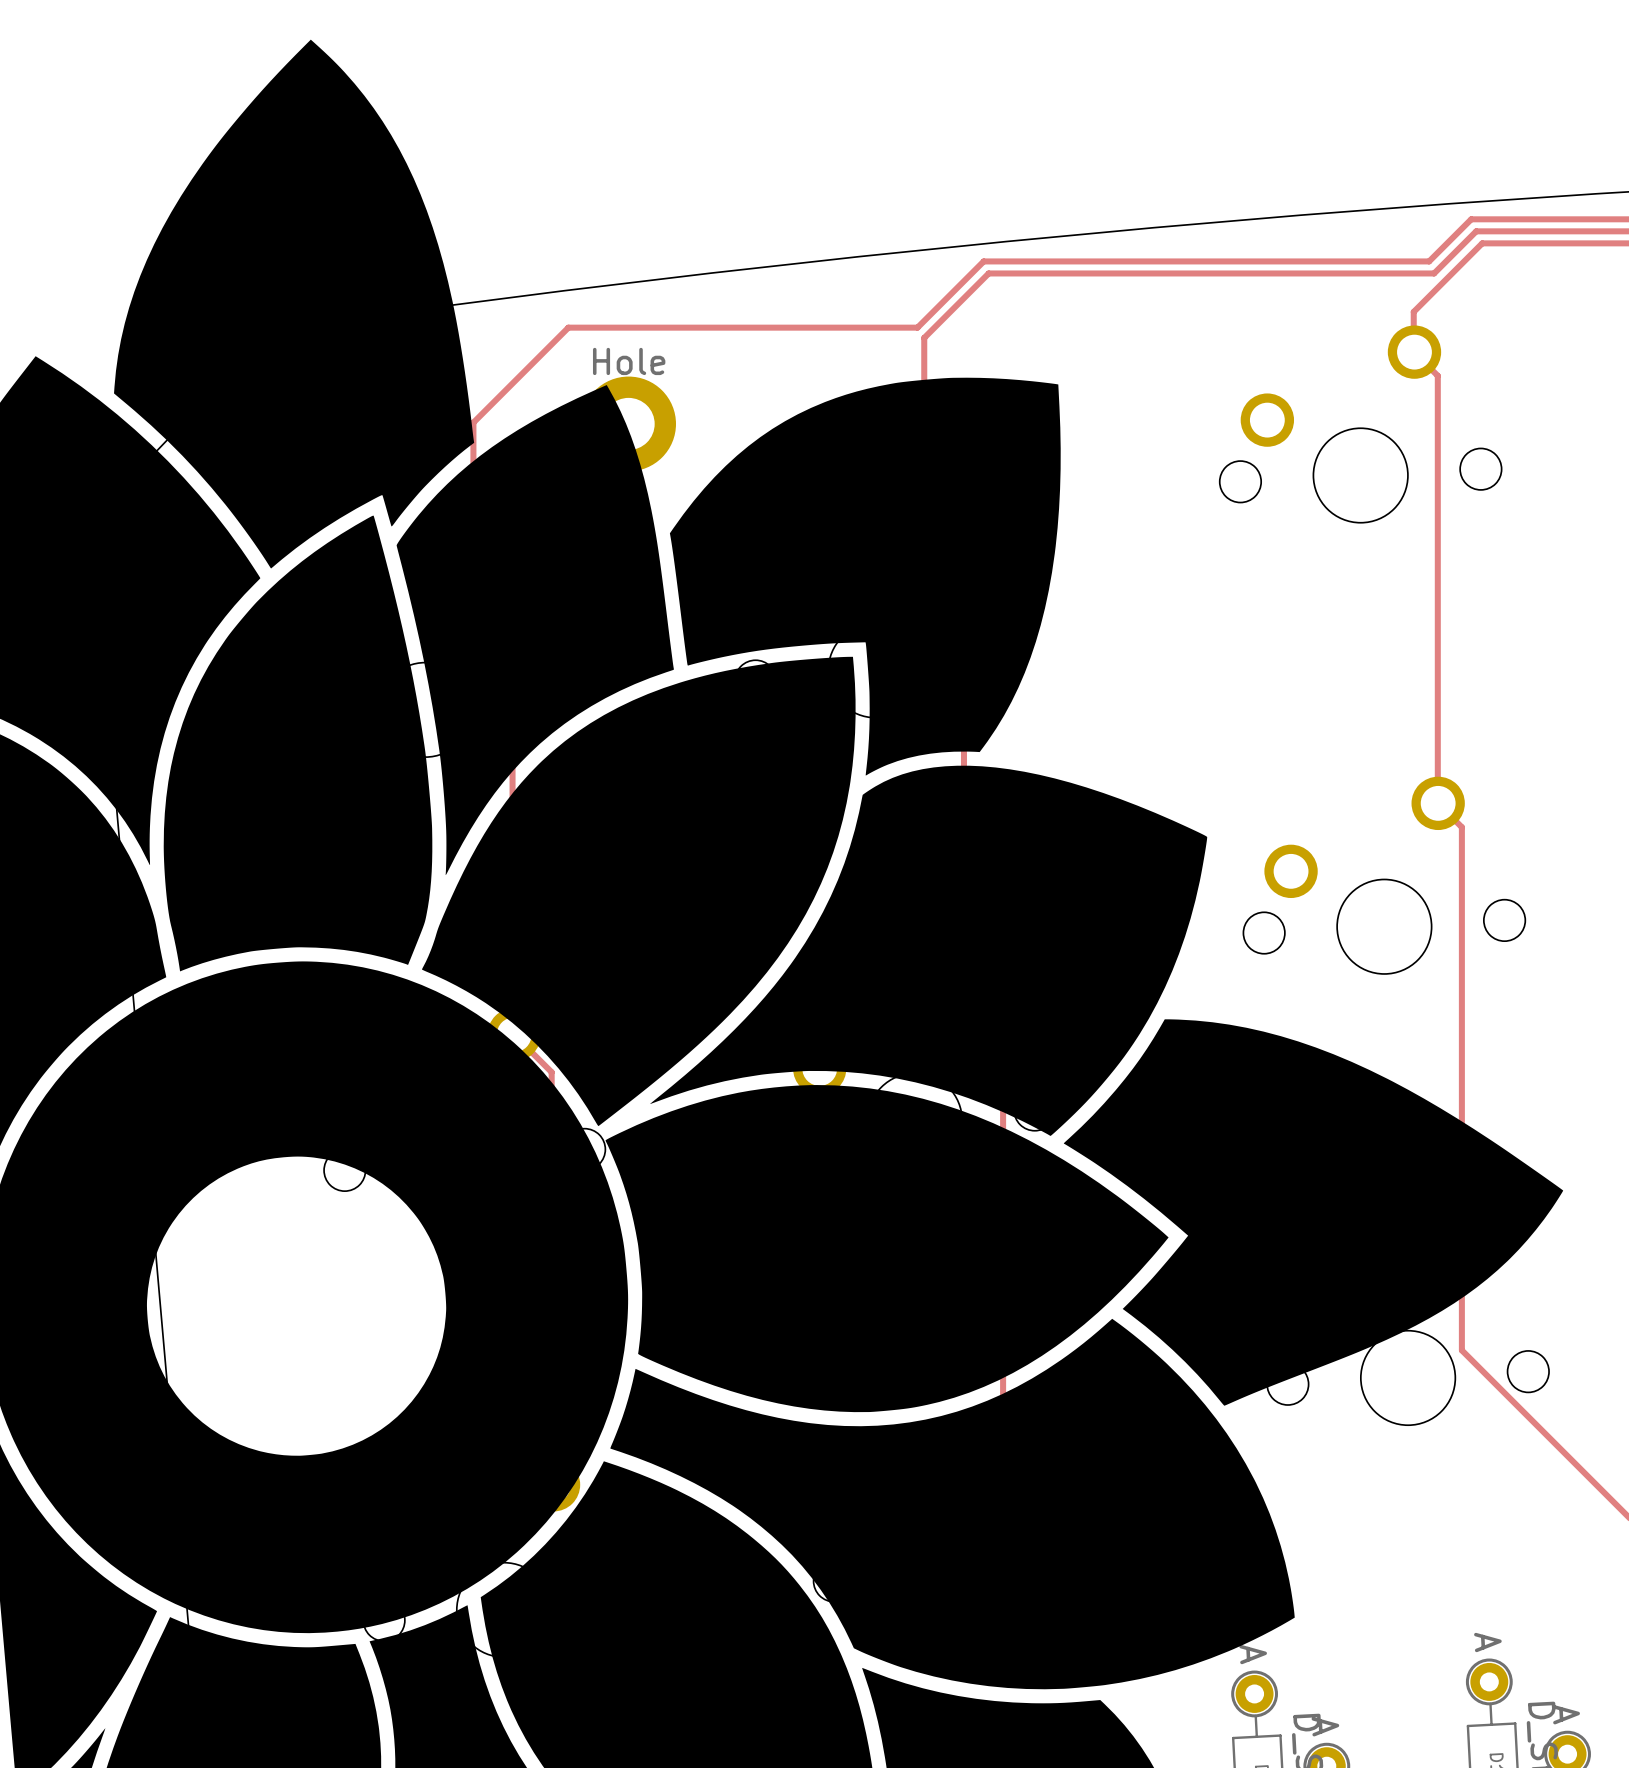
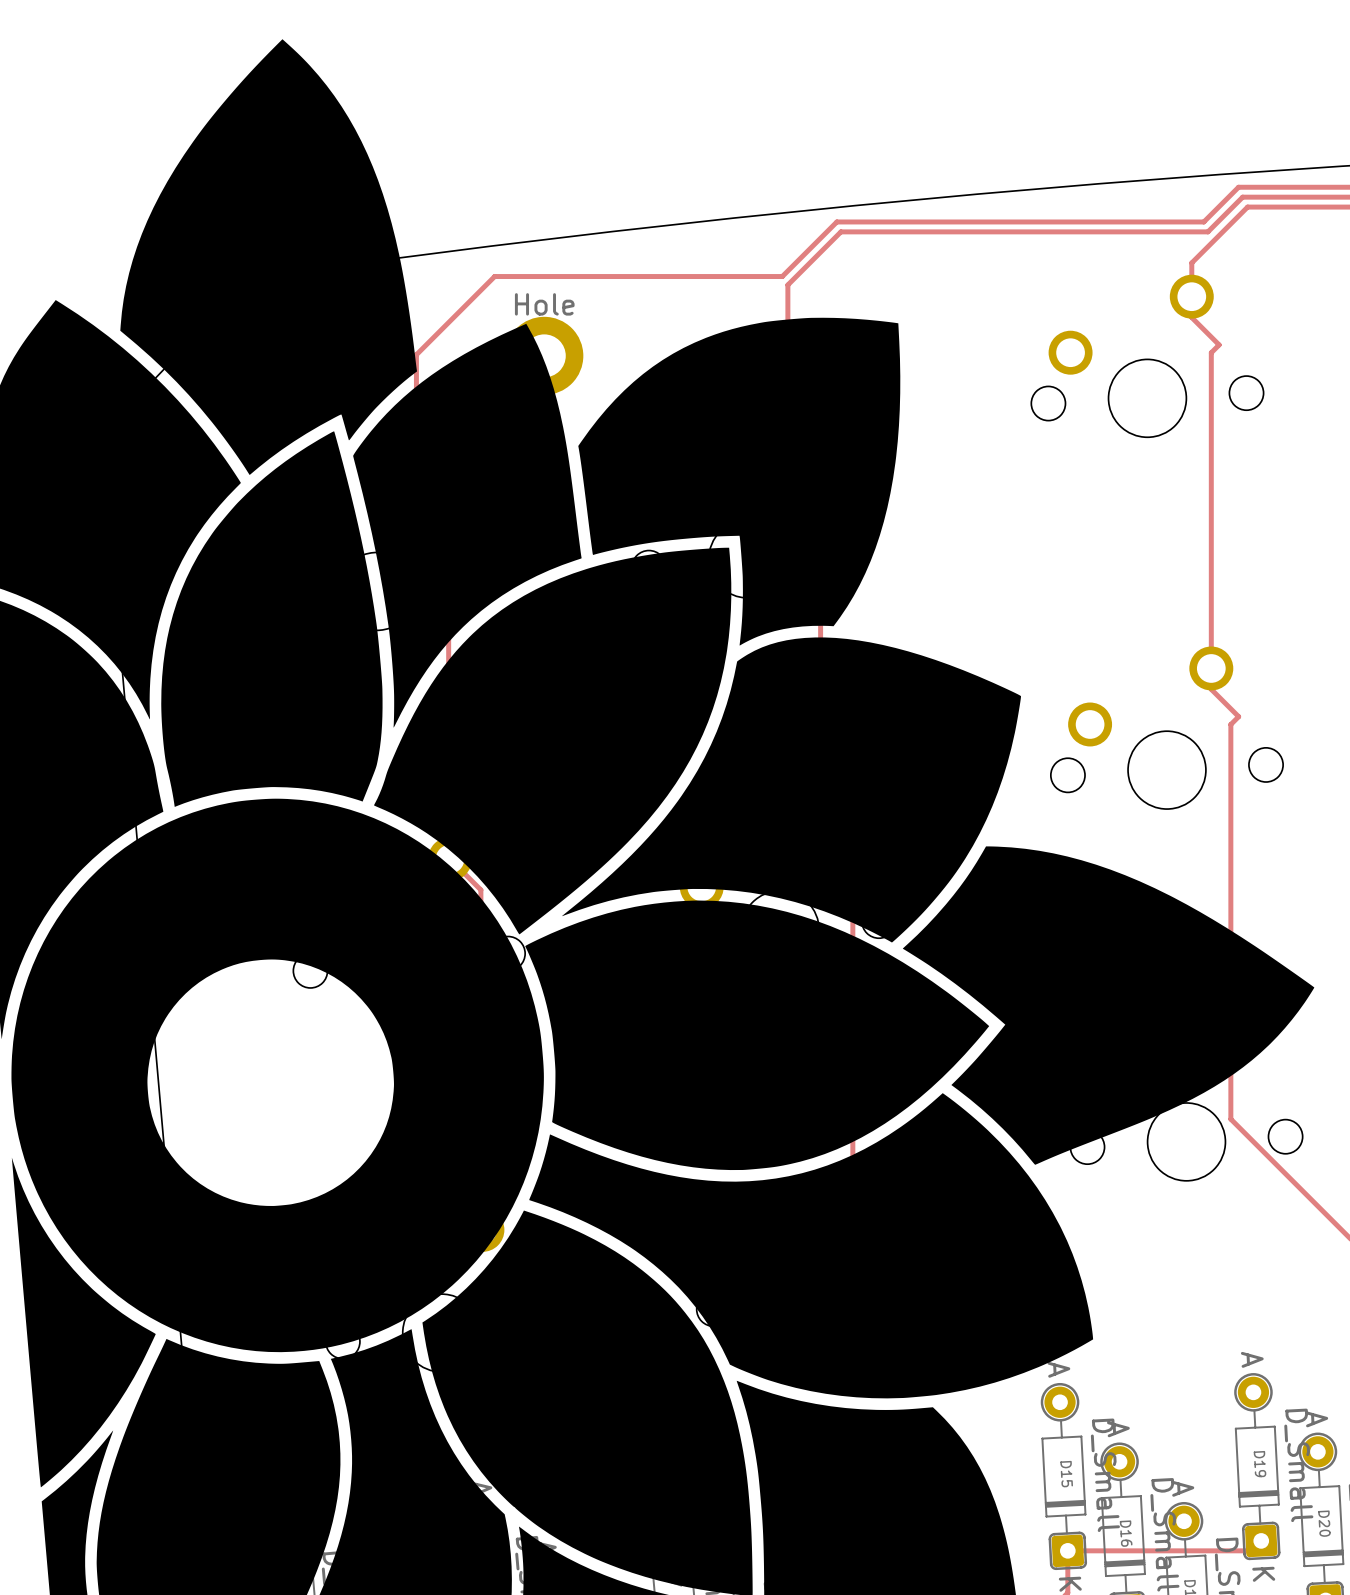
track: (1414, 311) (1413, 351) (1437, 375) (1437, 803) (1461, 827) (1461, 871) -> (1191, 262) (1191, 317) (1219, 344) (1211, 352) (1211, 689) (1238, 716) (1230, 724)

